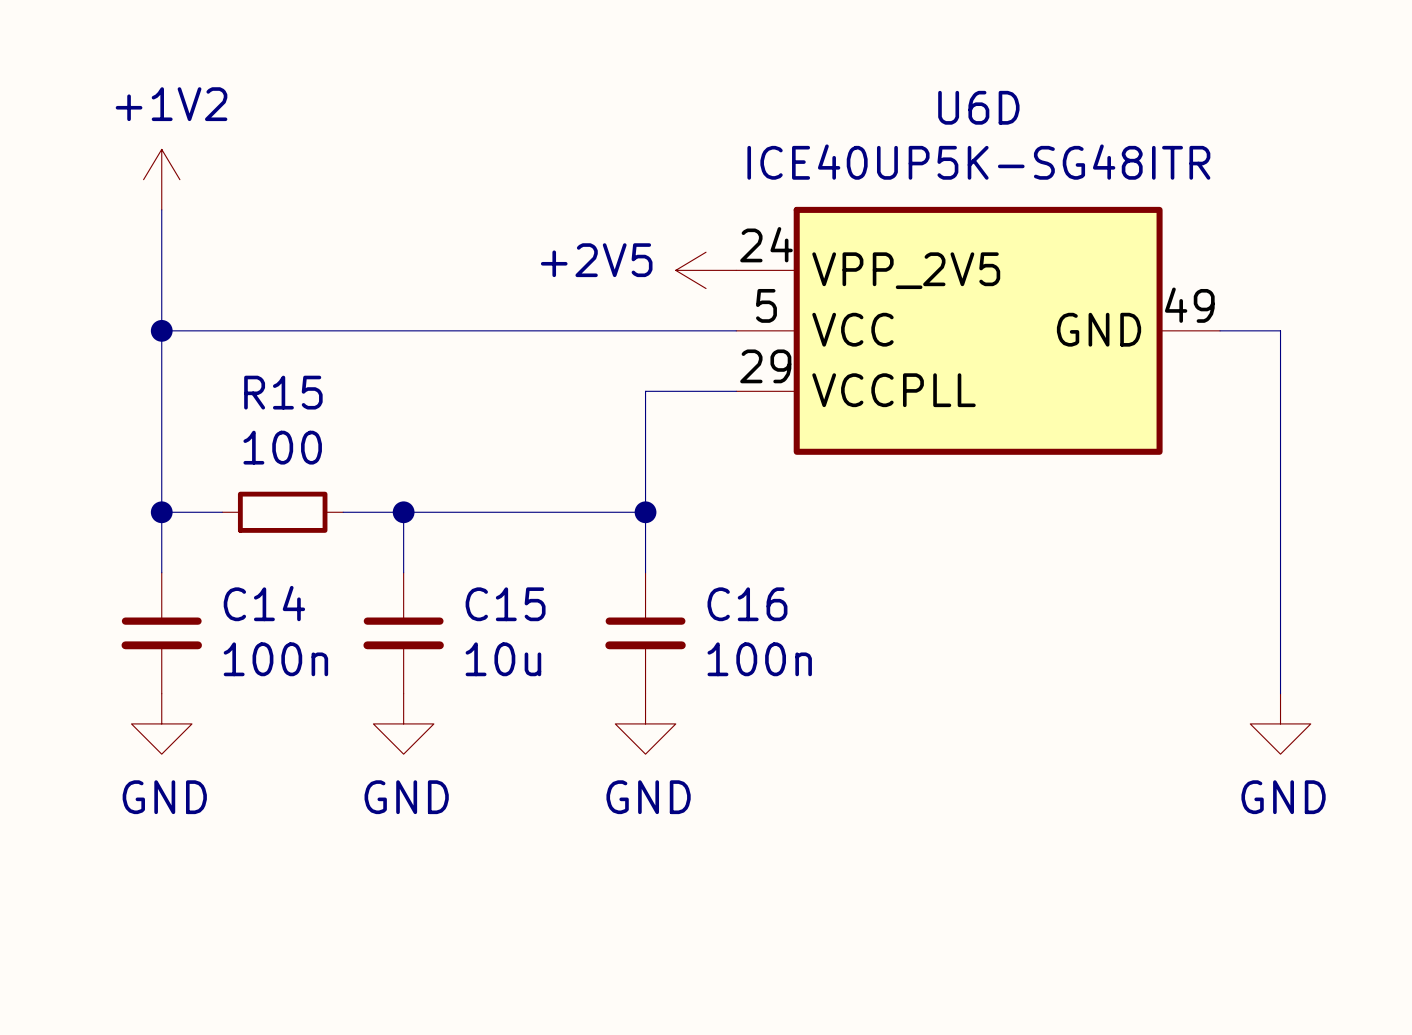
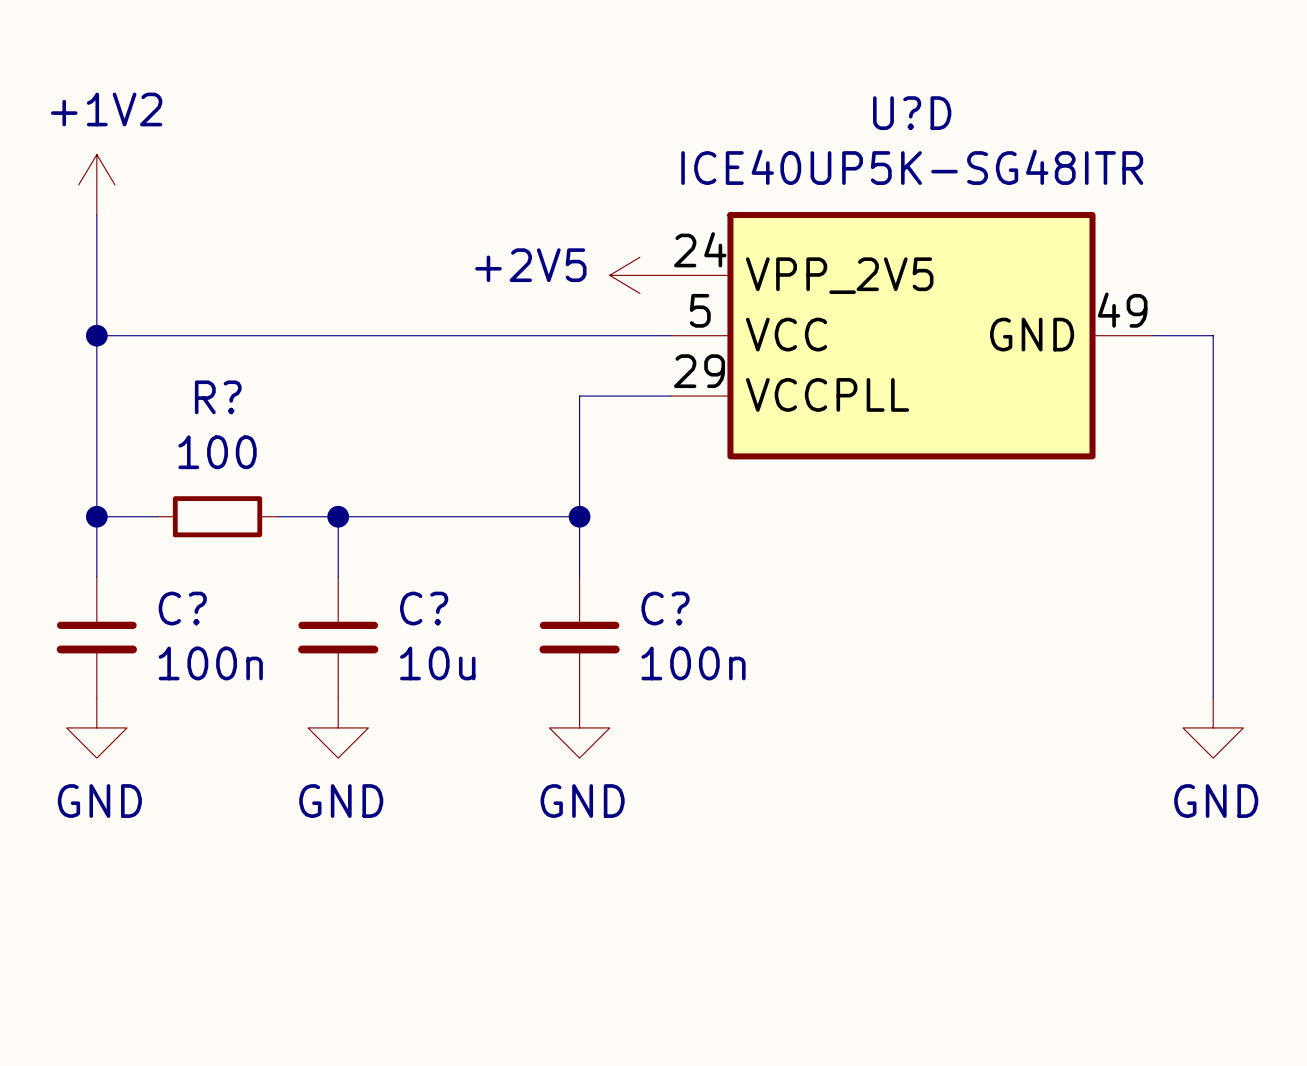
U6D name: U6D (978, 107) -> U?D (912, 113)
R15 name: R15 (283, 392) -> R? (218, 397)
C14 name: C14 (264, 603) -> C? (182, 608)
C15 name: C15 (505, 604) -> C? (424, 608)
C16 name: C16 (747, 604) -> C? (665, 608)

